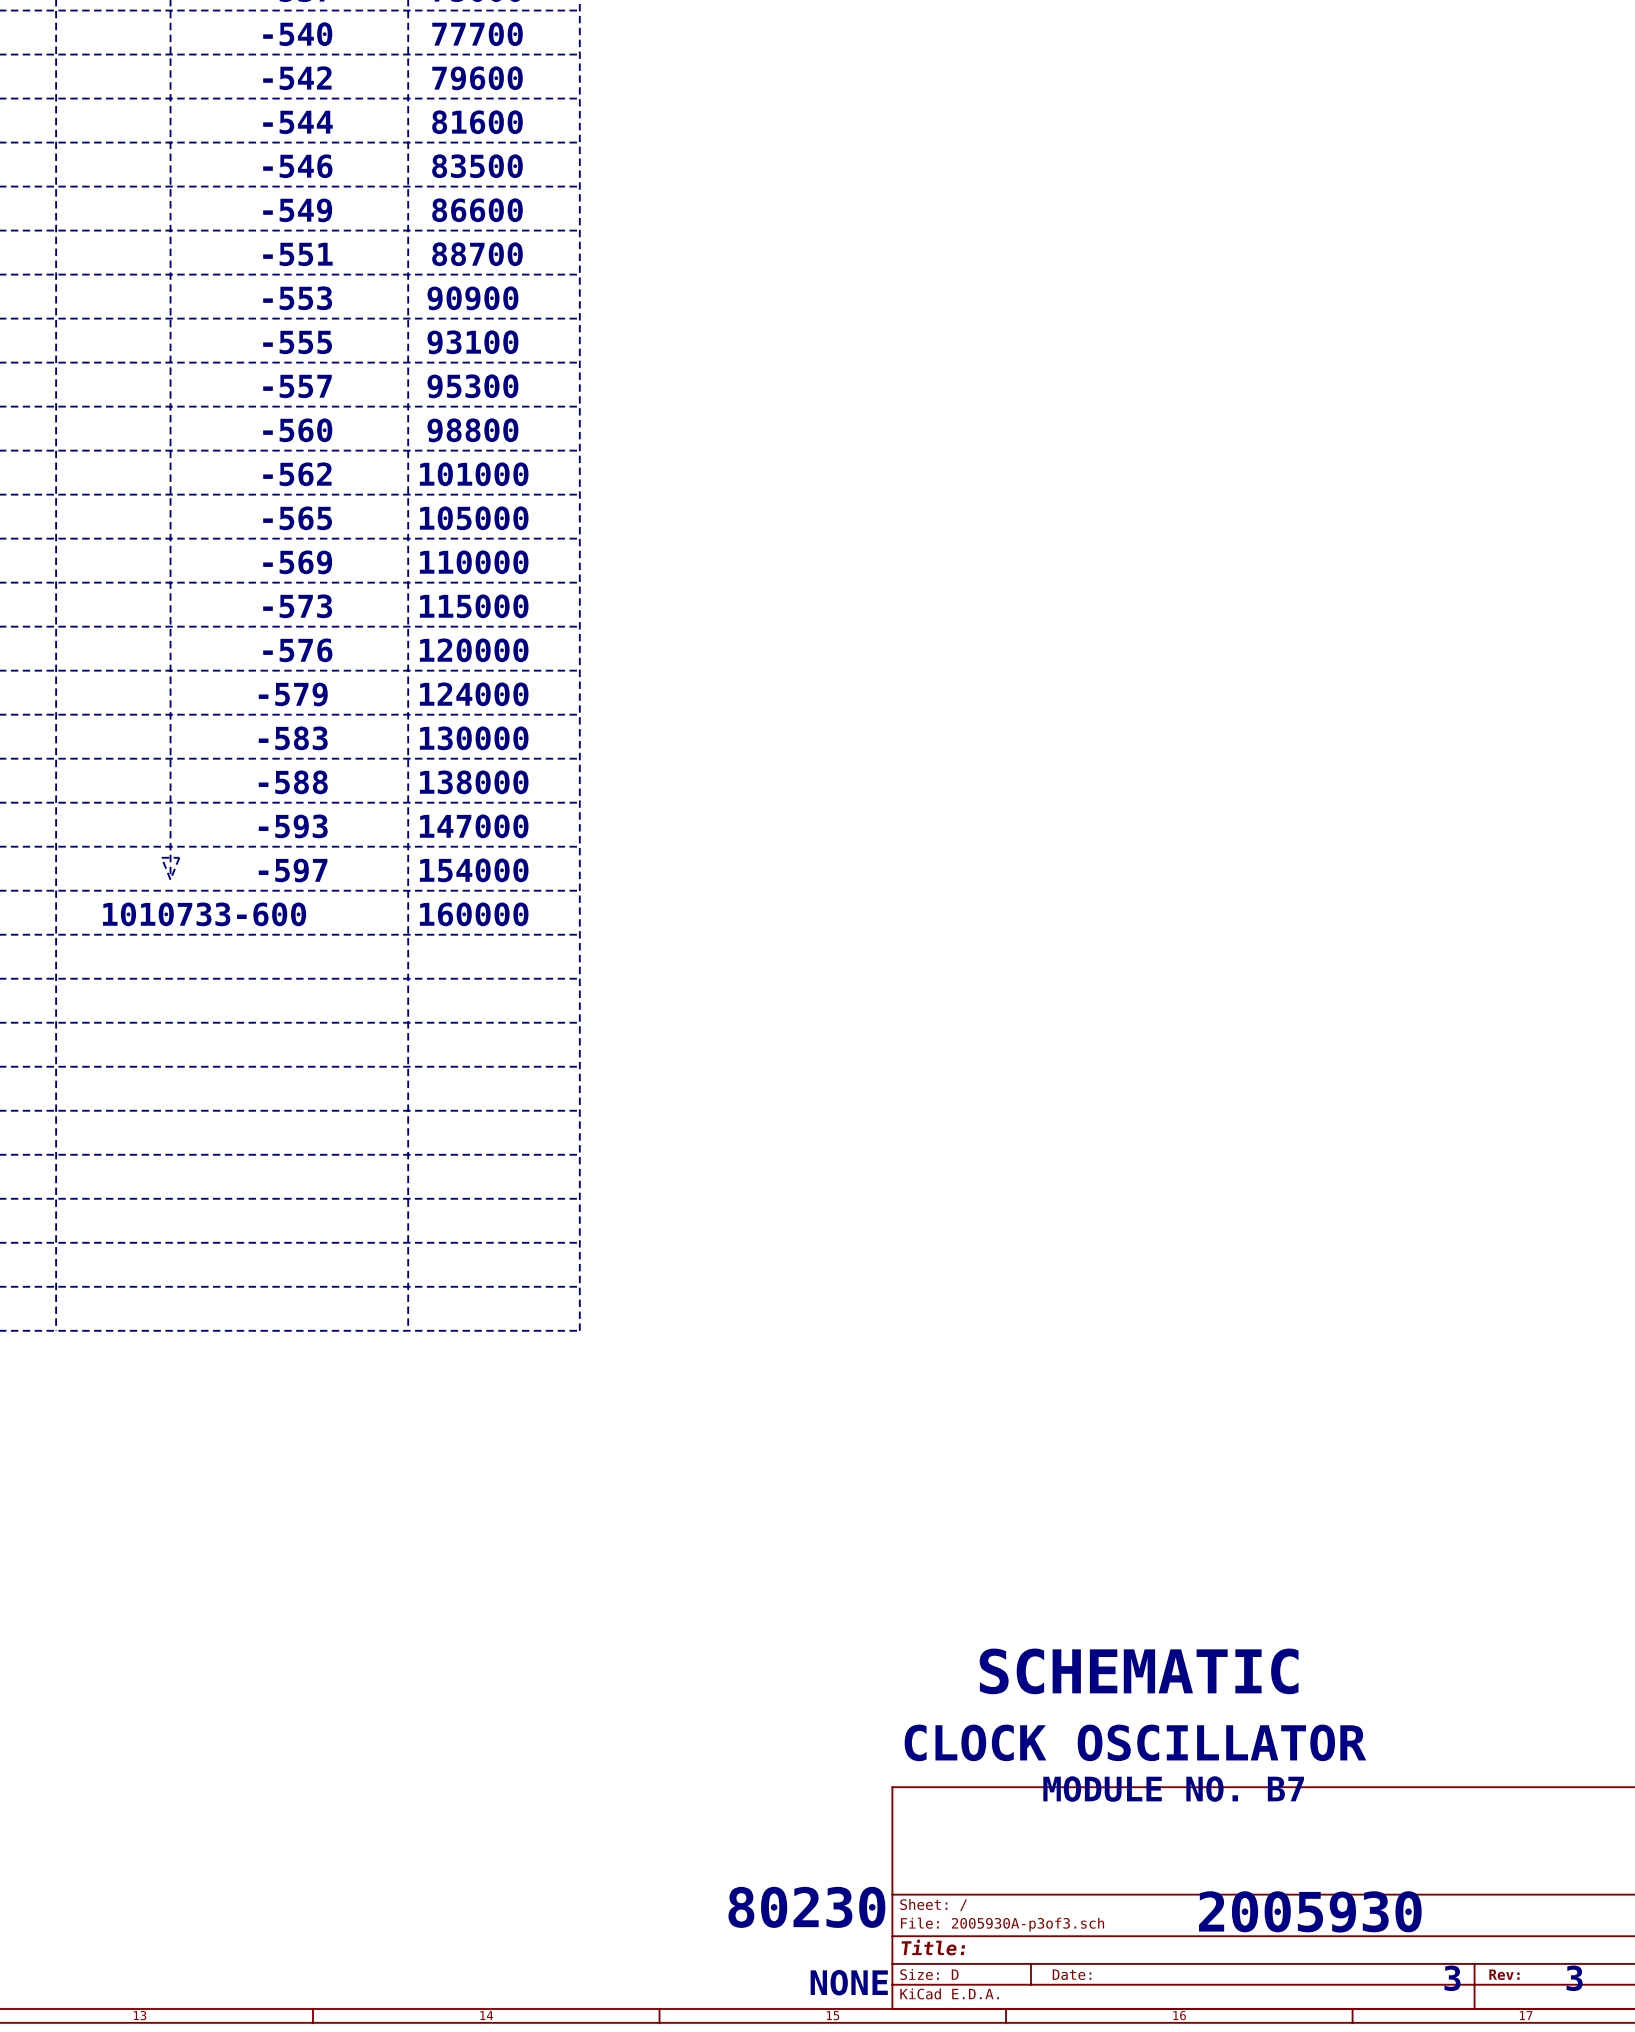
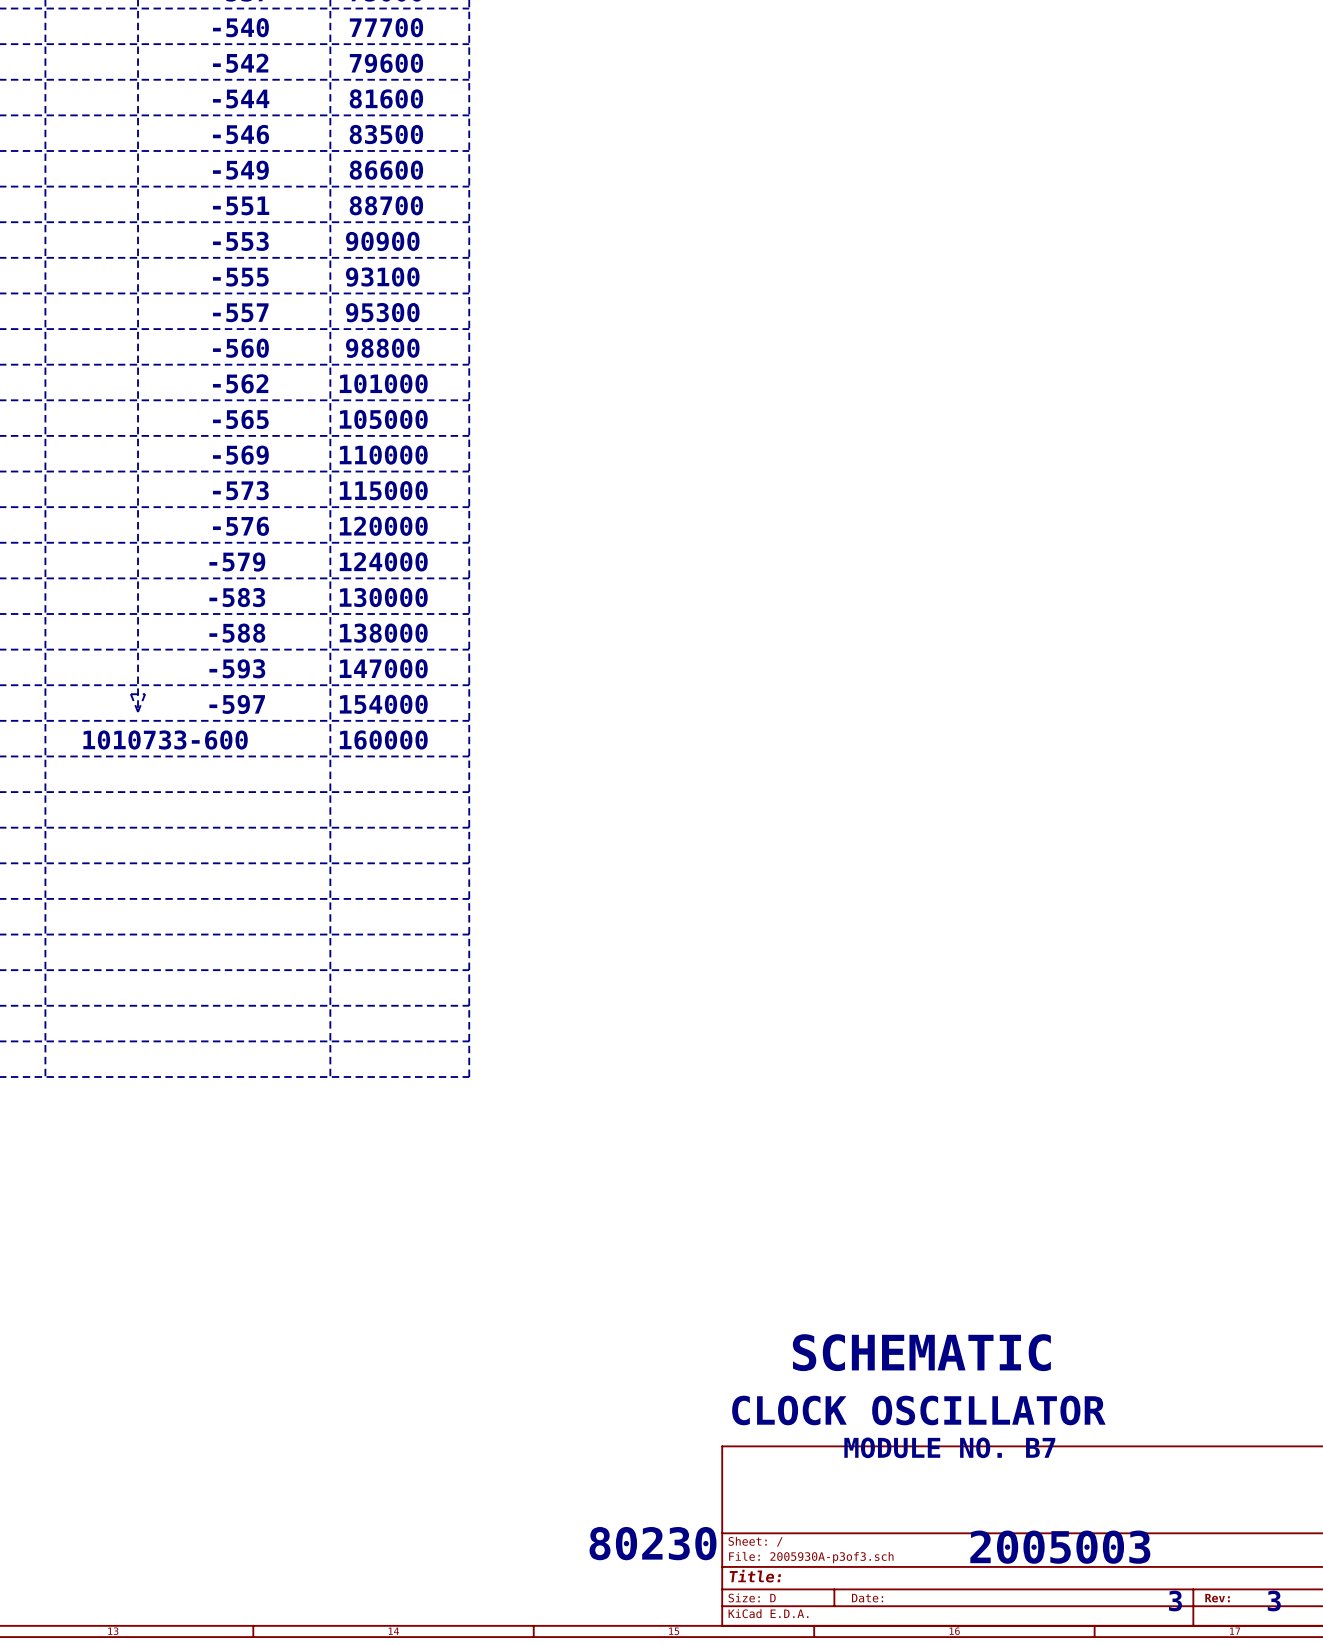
text: 2005930 (1310, 1911) -> 2005003 (1060, 1547)
text: NONE (849, 1982) -> none

